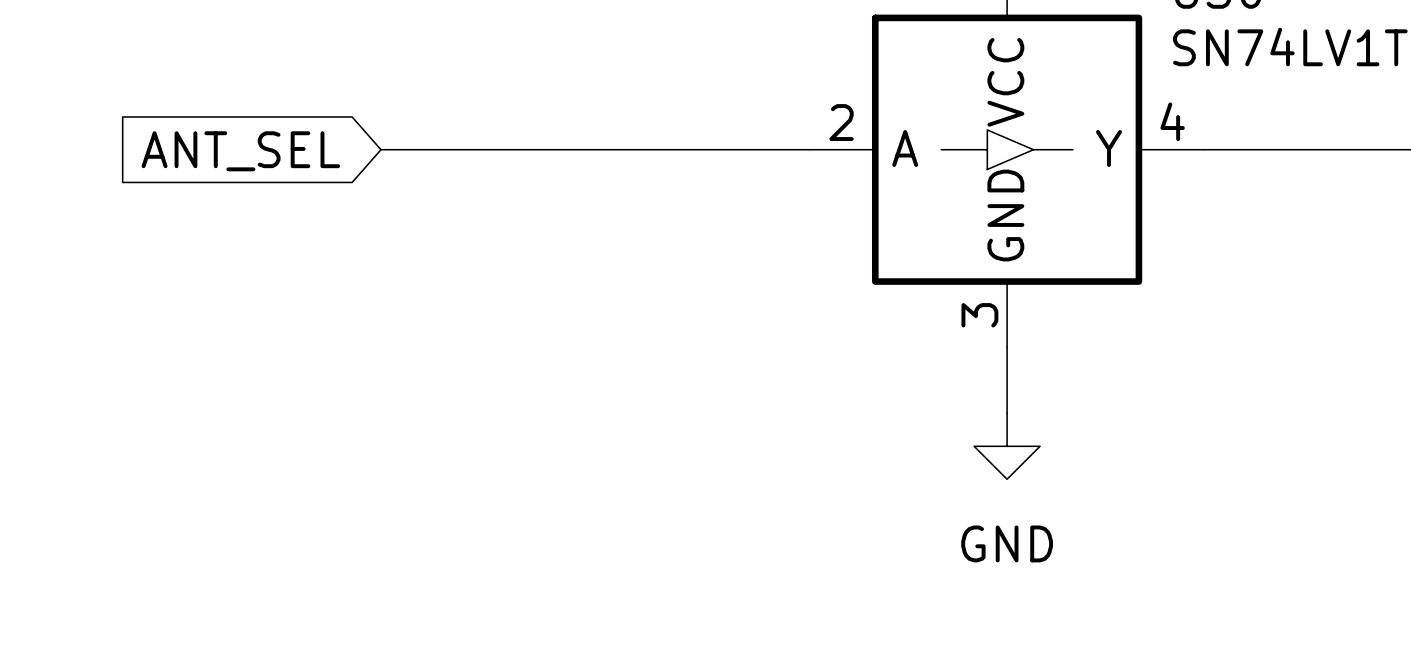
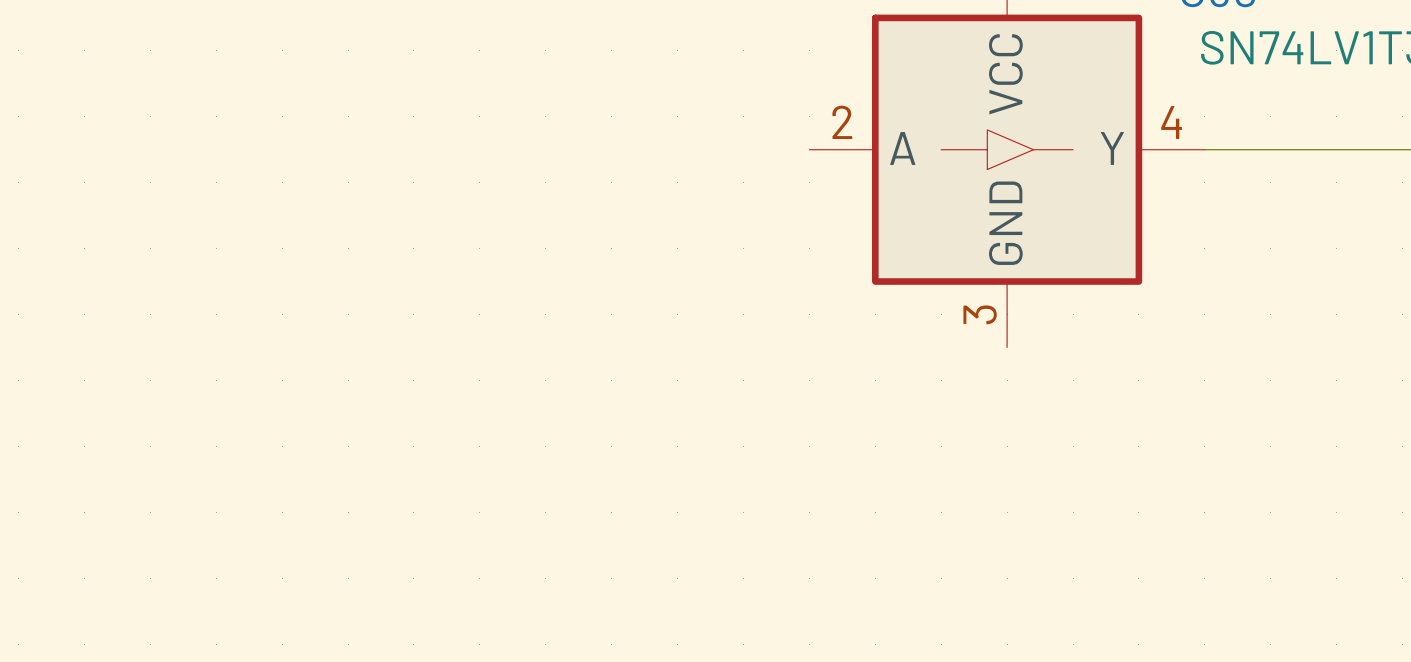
wire: (380, 149) (809, 149) -> none
global label: ANT_SEL (240, 151) -> none
wire: (1007, 347) (1007, 413) -> none
power symbol: GND (1007, 446) -> none

